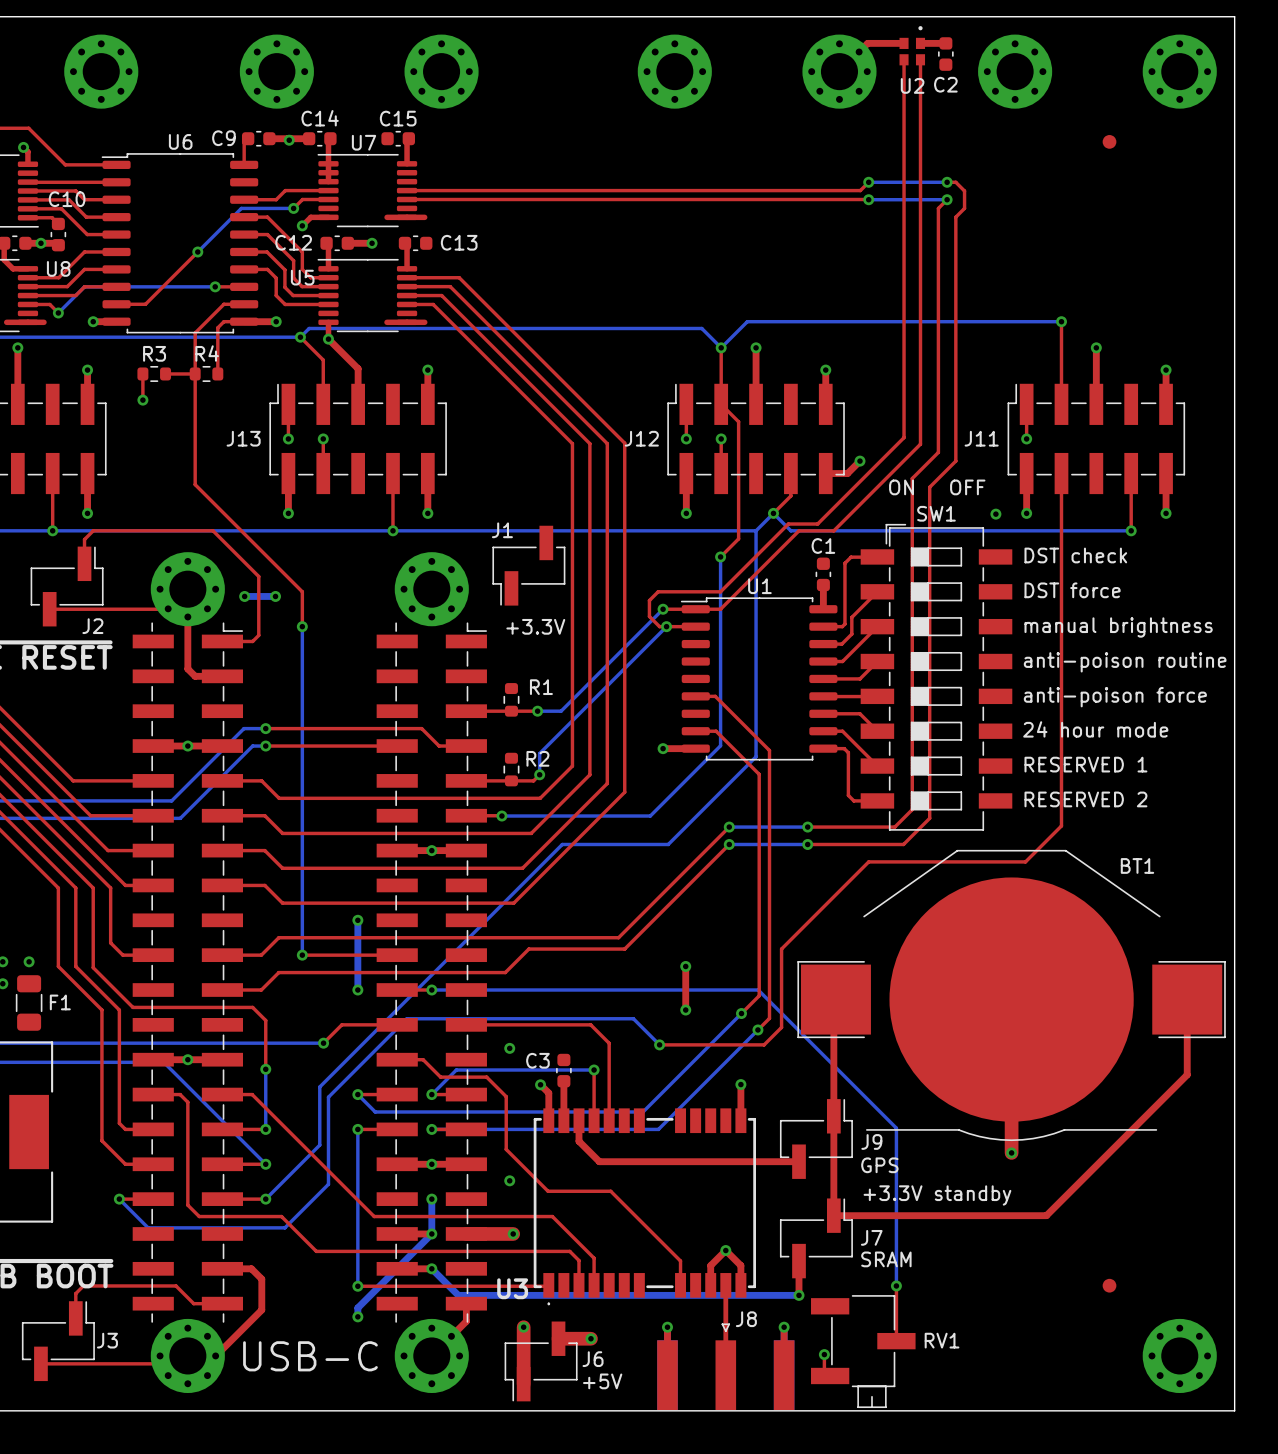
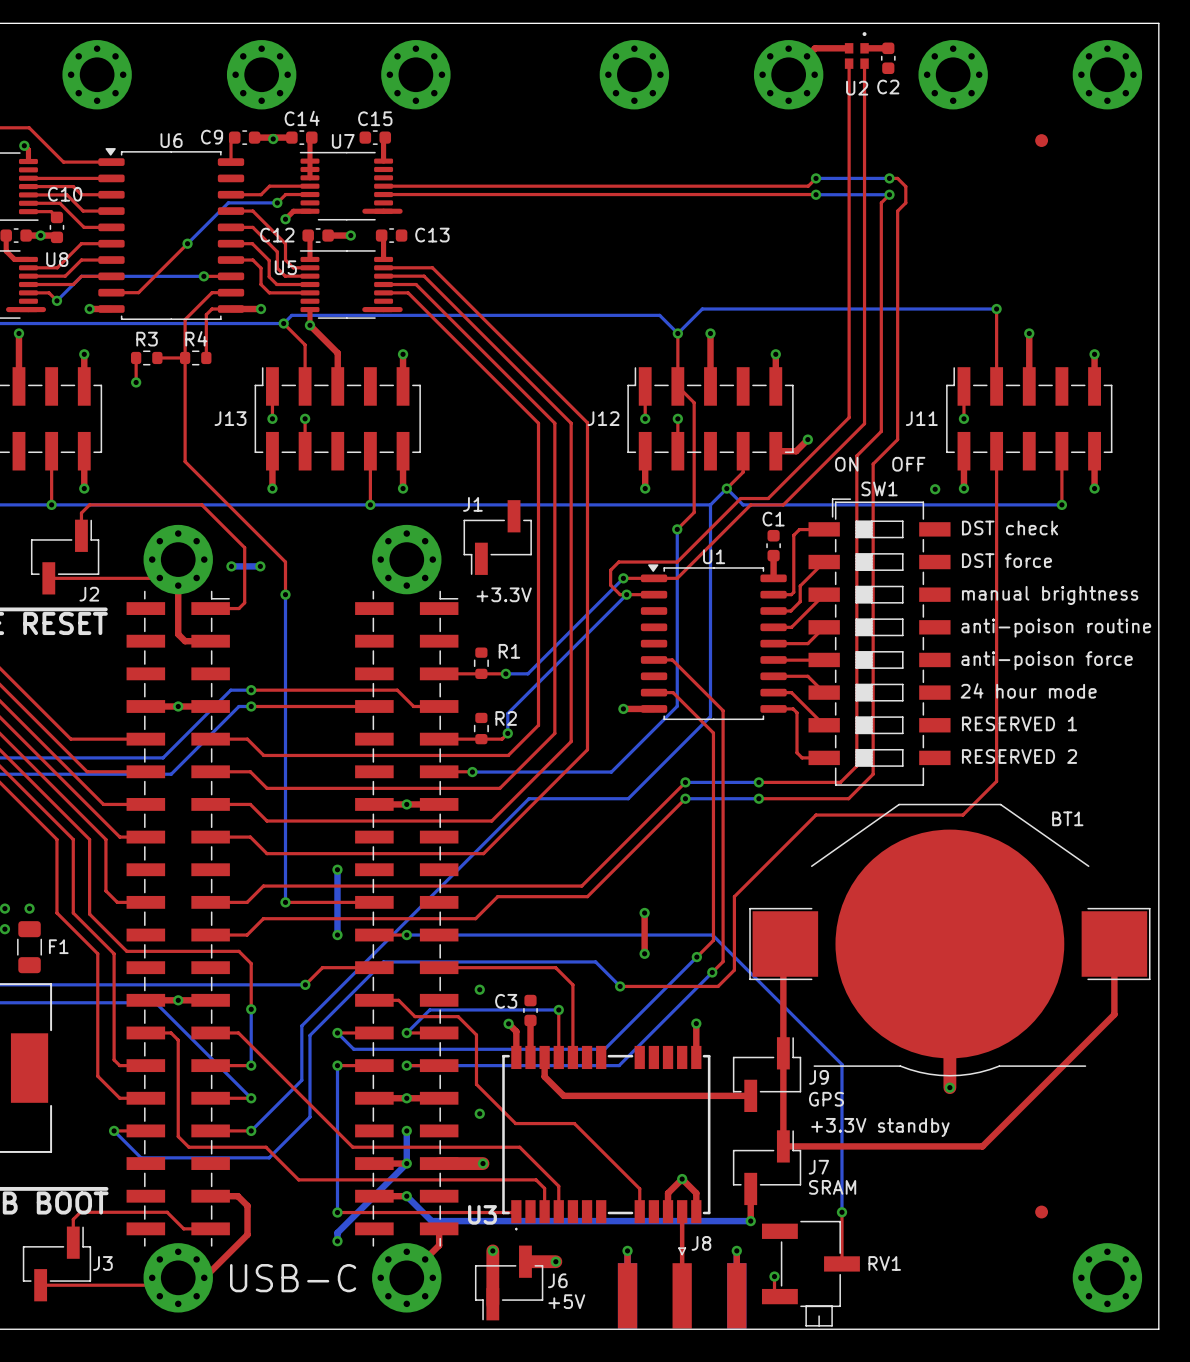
U6 footprint: [101, 153, 259, 334] -> [98, 148, 245, 320]
U1 footprint: [680, 597, 838, 761] -> [640, 564, 787, 721]

